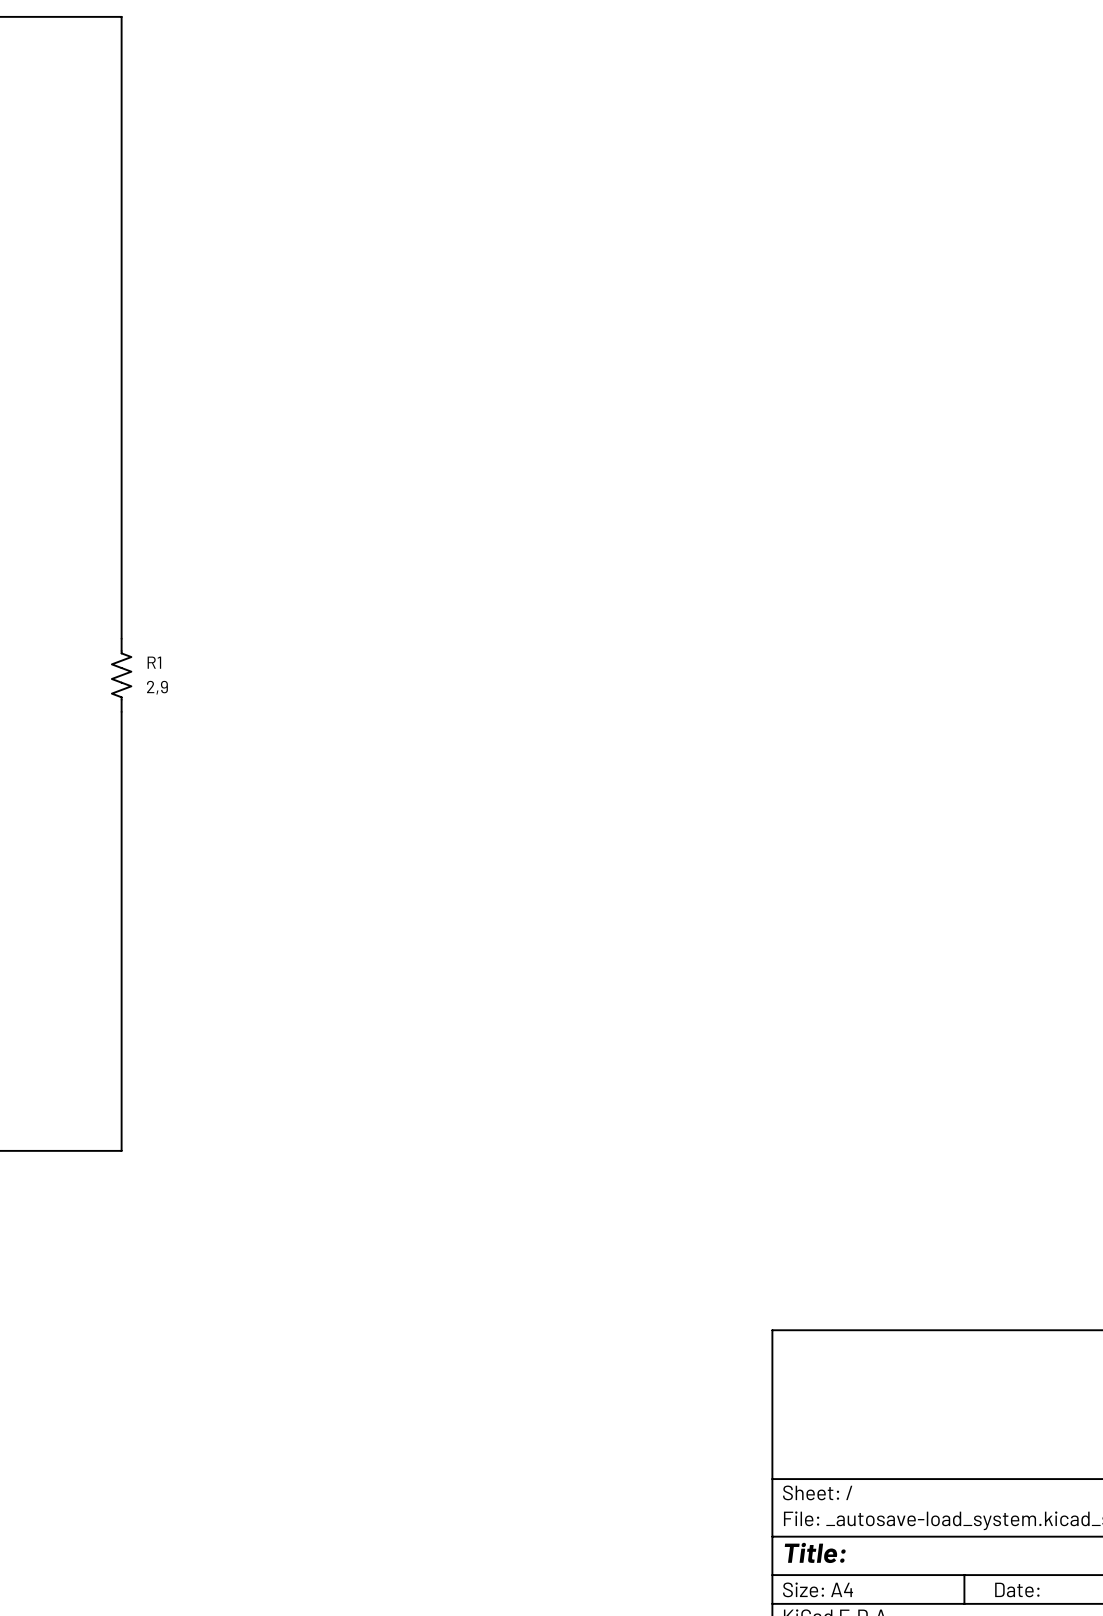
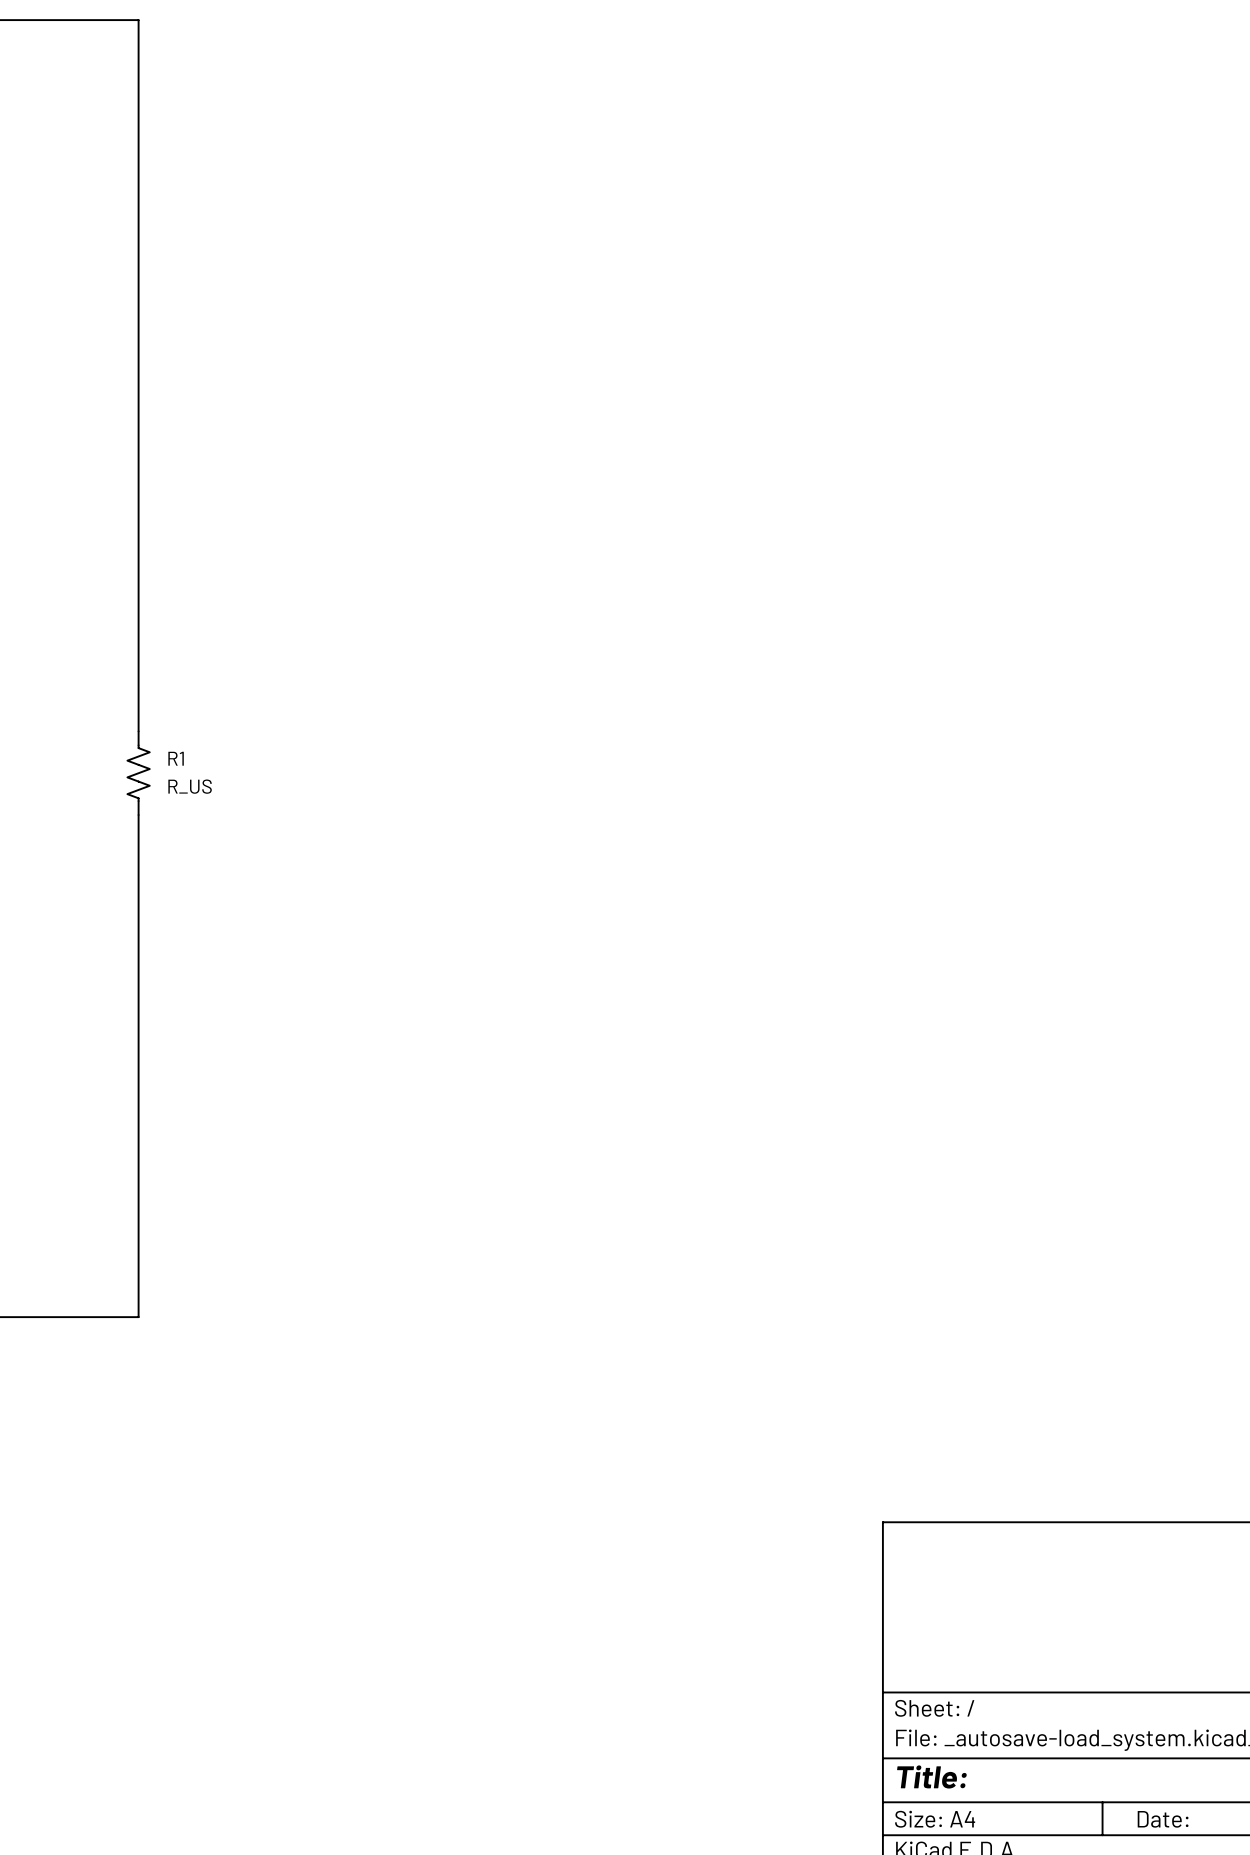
R1 value: 2,9 (157, 687) -> R_US (190, 786)

